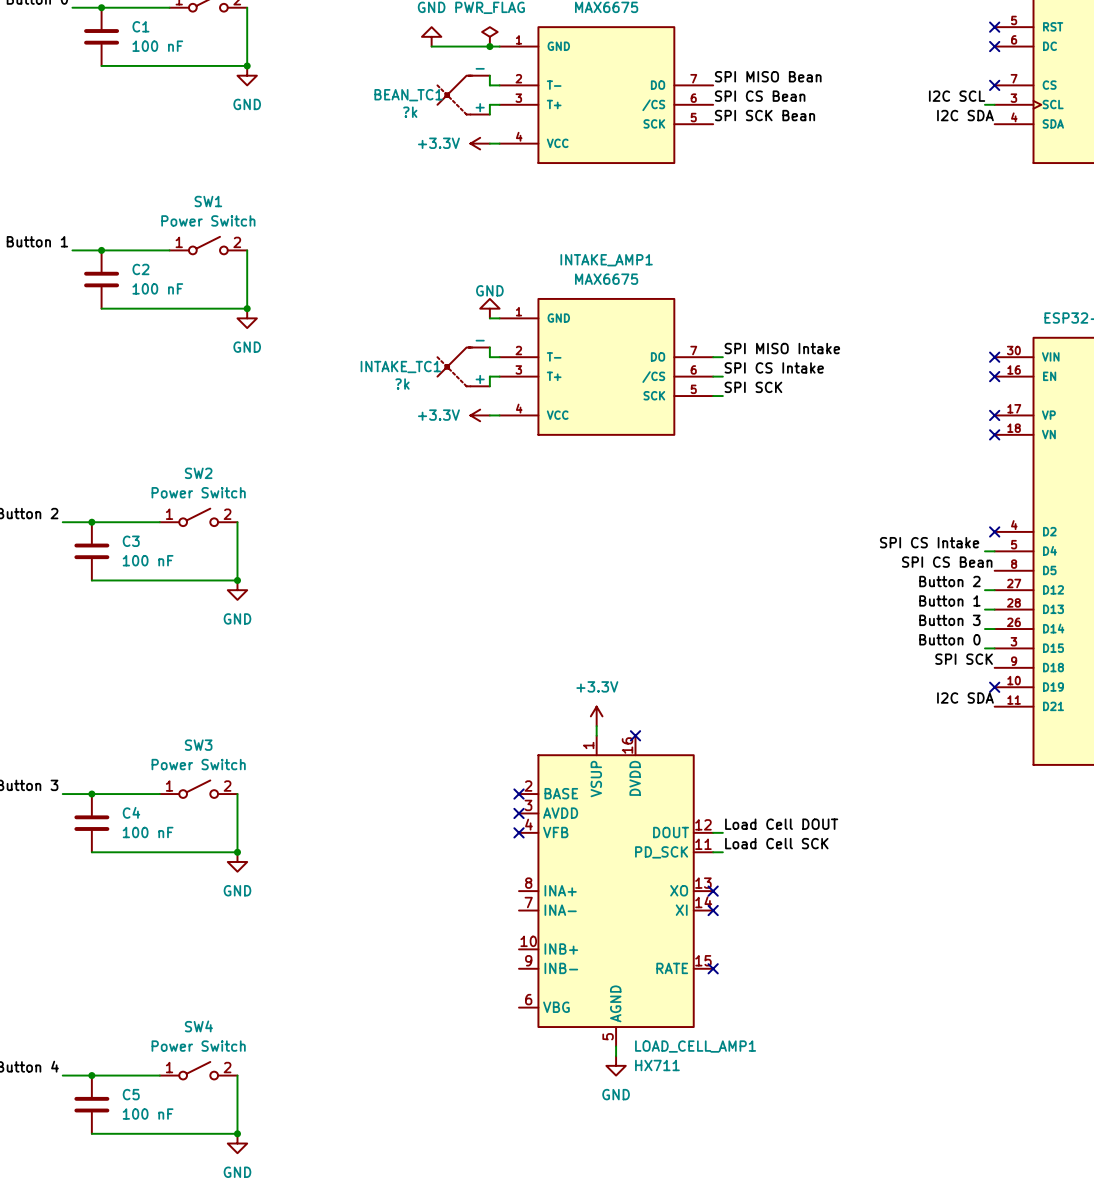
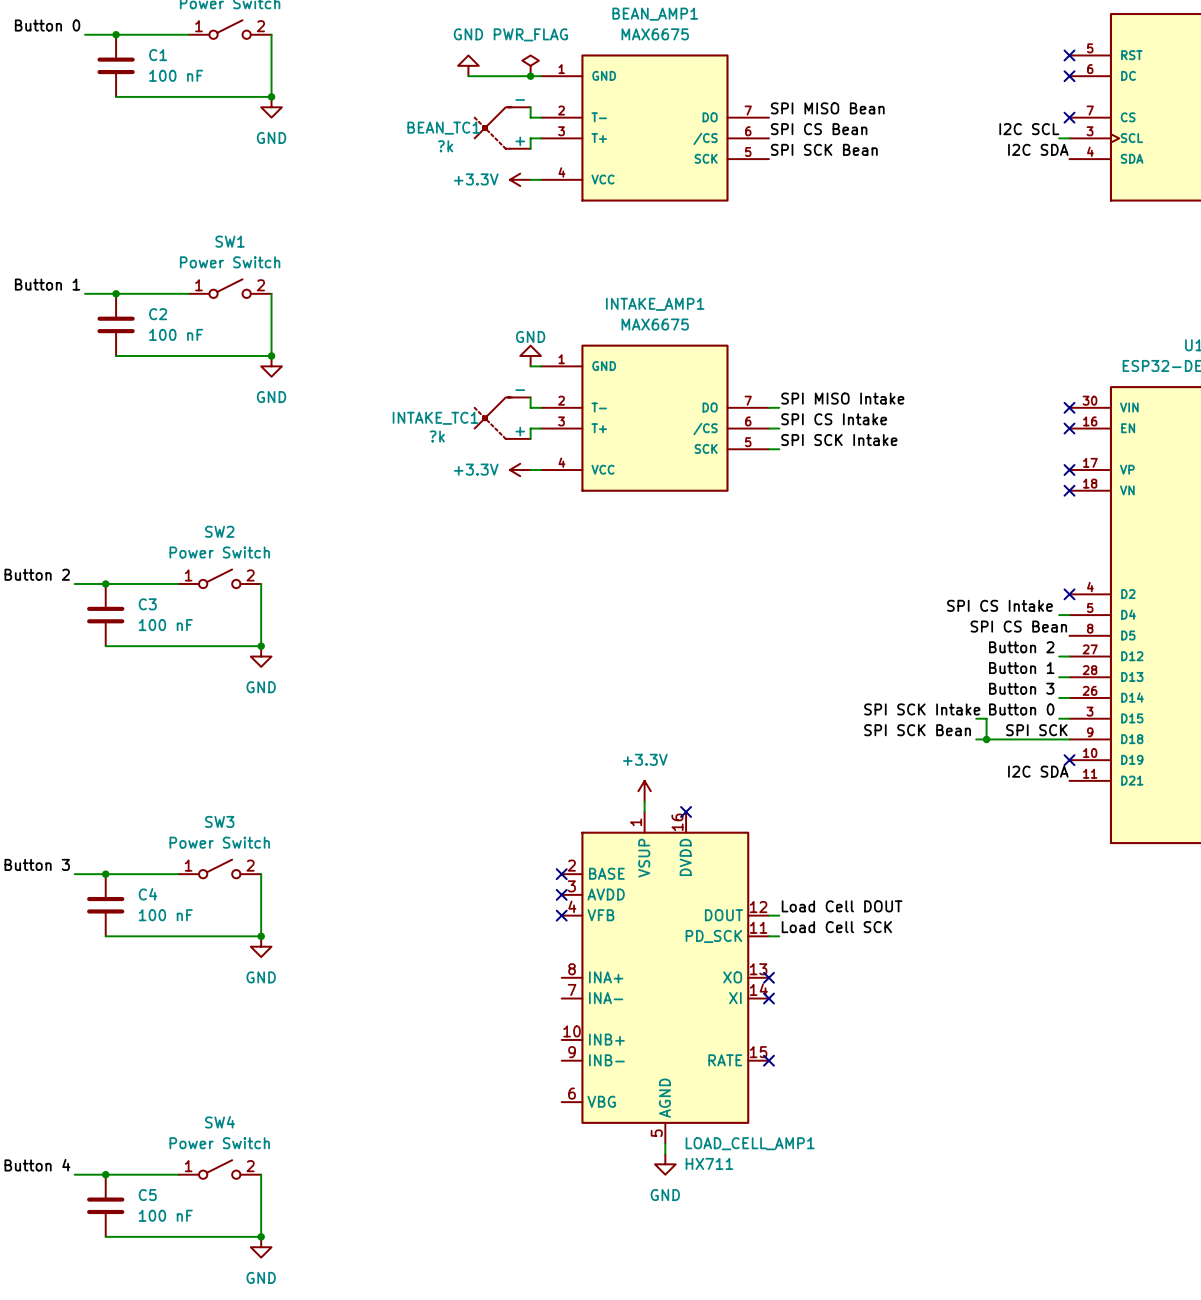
label: SPI SCK (753, 387) -> SPI SCK Intake (839, 440)
label: none -> SPI SCK Intake (922, 709)
wire: none -> (976, 718) (986, 718) (986, 739)
label: none -> SPI SCK Bean (917, 730)
wire: none -> (976, 739) (1069, 739)
junction: none -> (986, 739)

